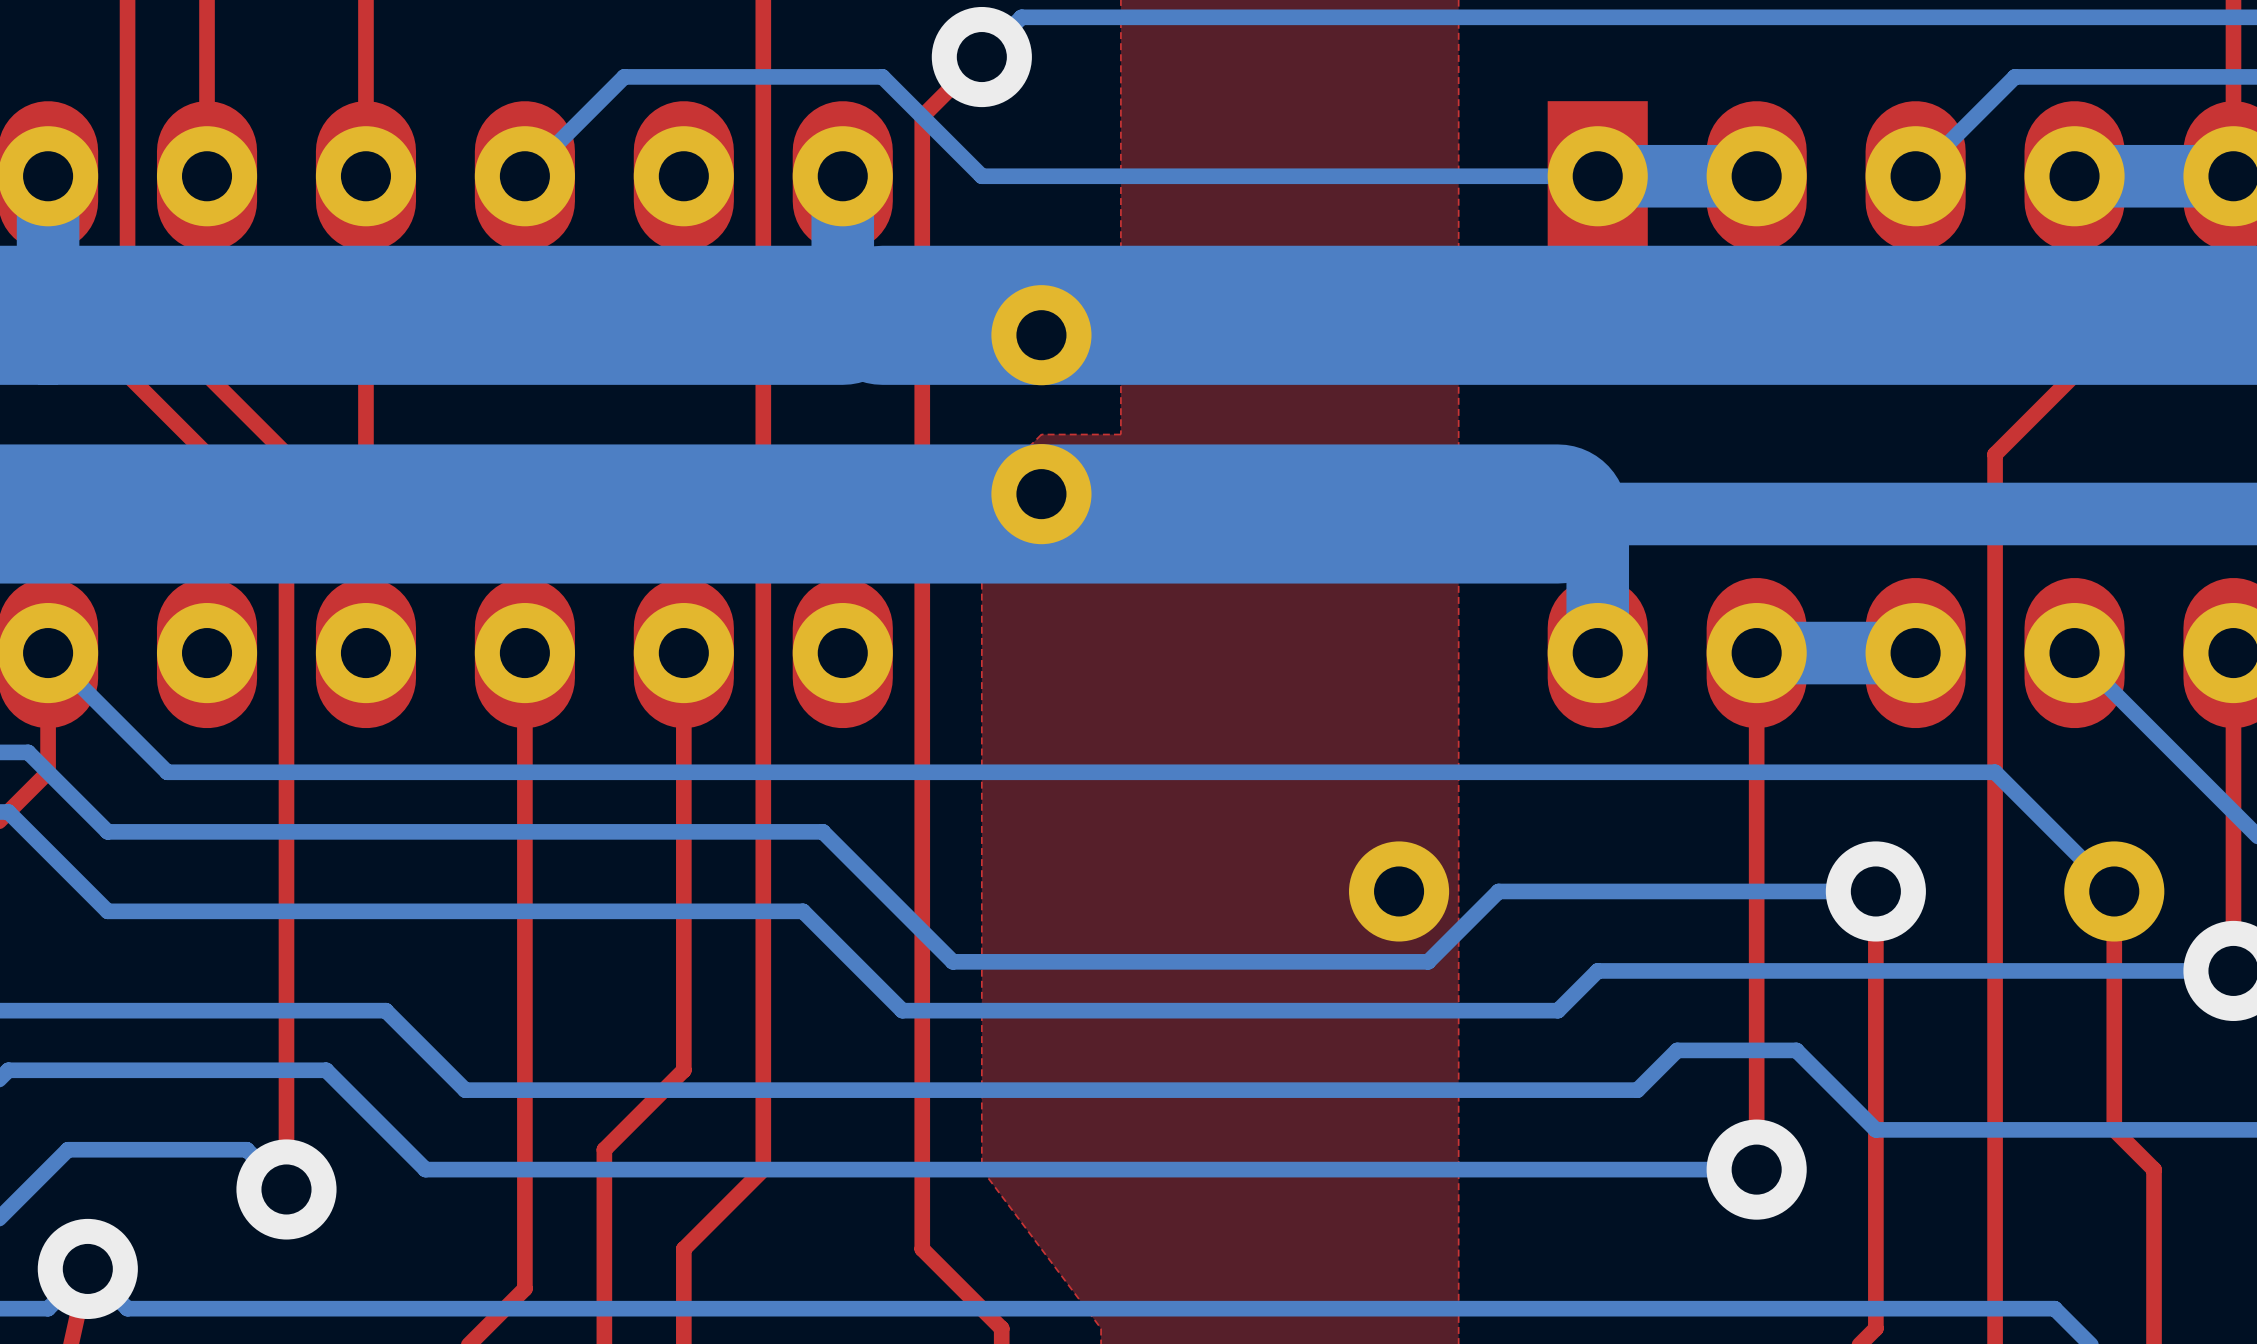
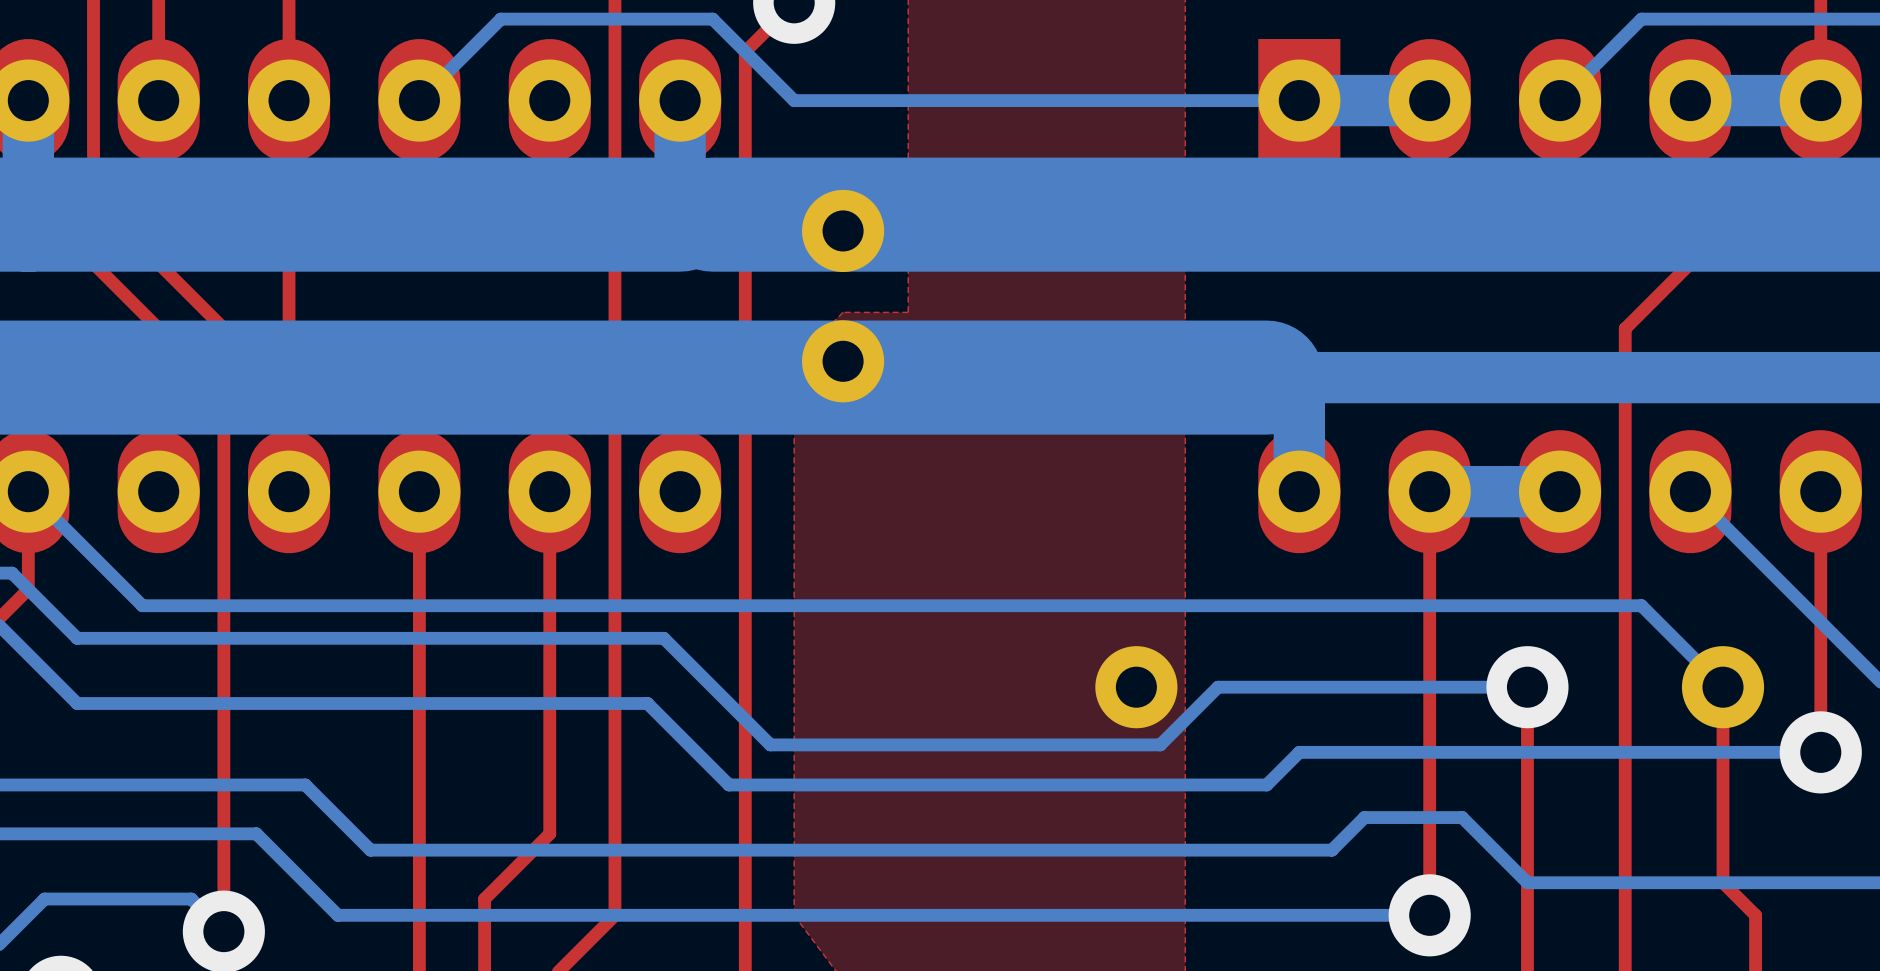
bottom track: (167, 772) (1995, 772) (2014, 792) -> (126, 589) (142, 605) (1641, 605)

